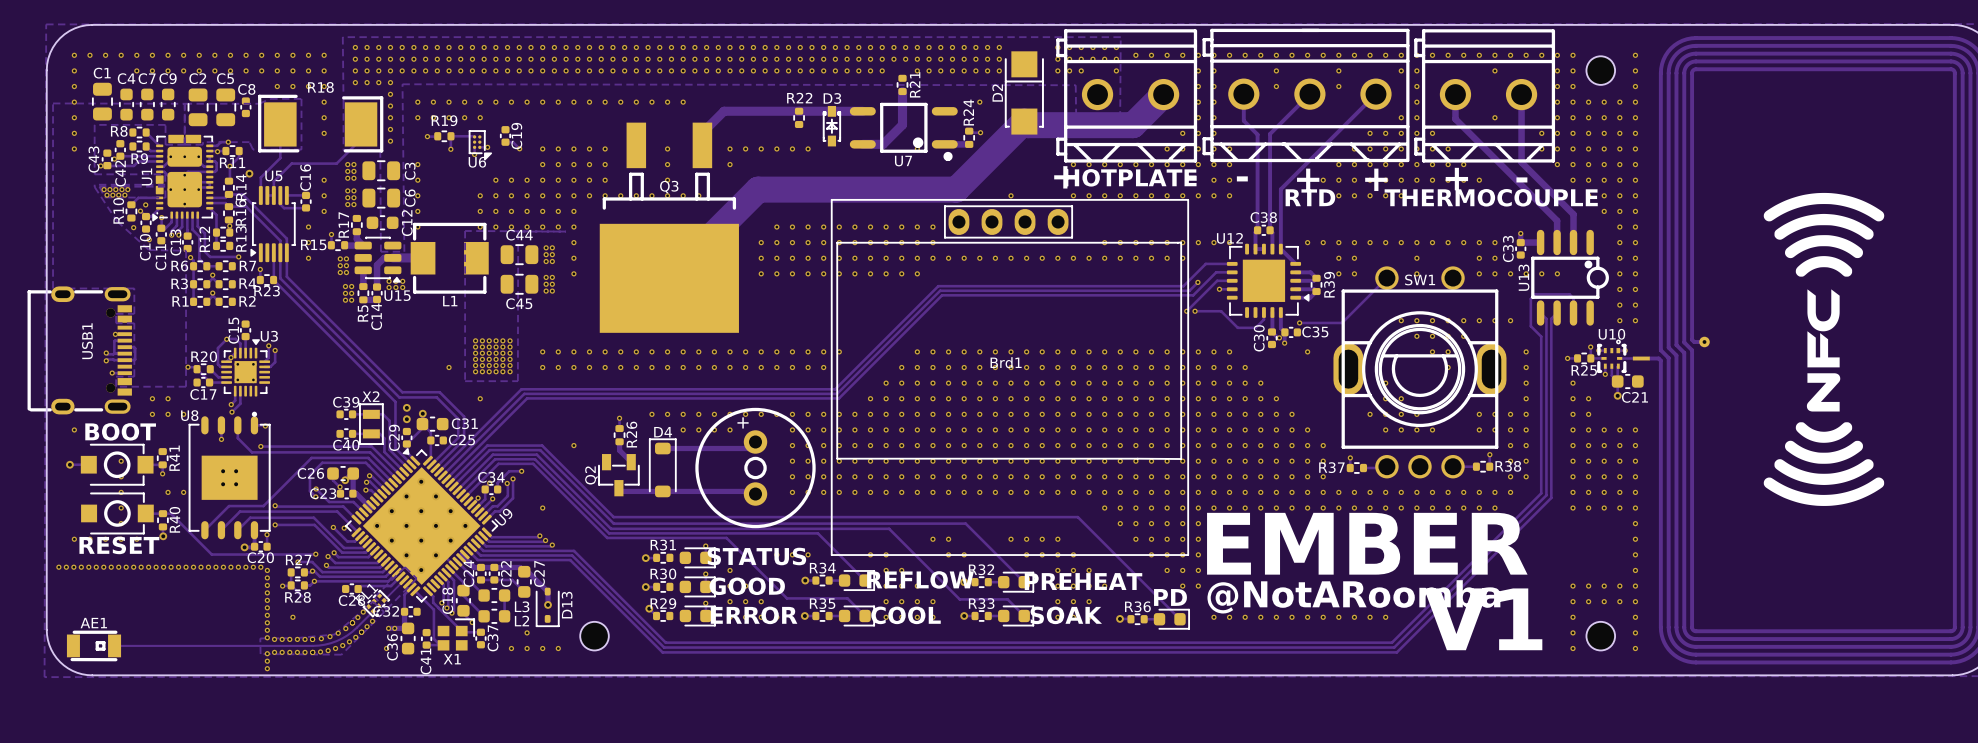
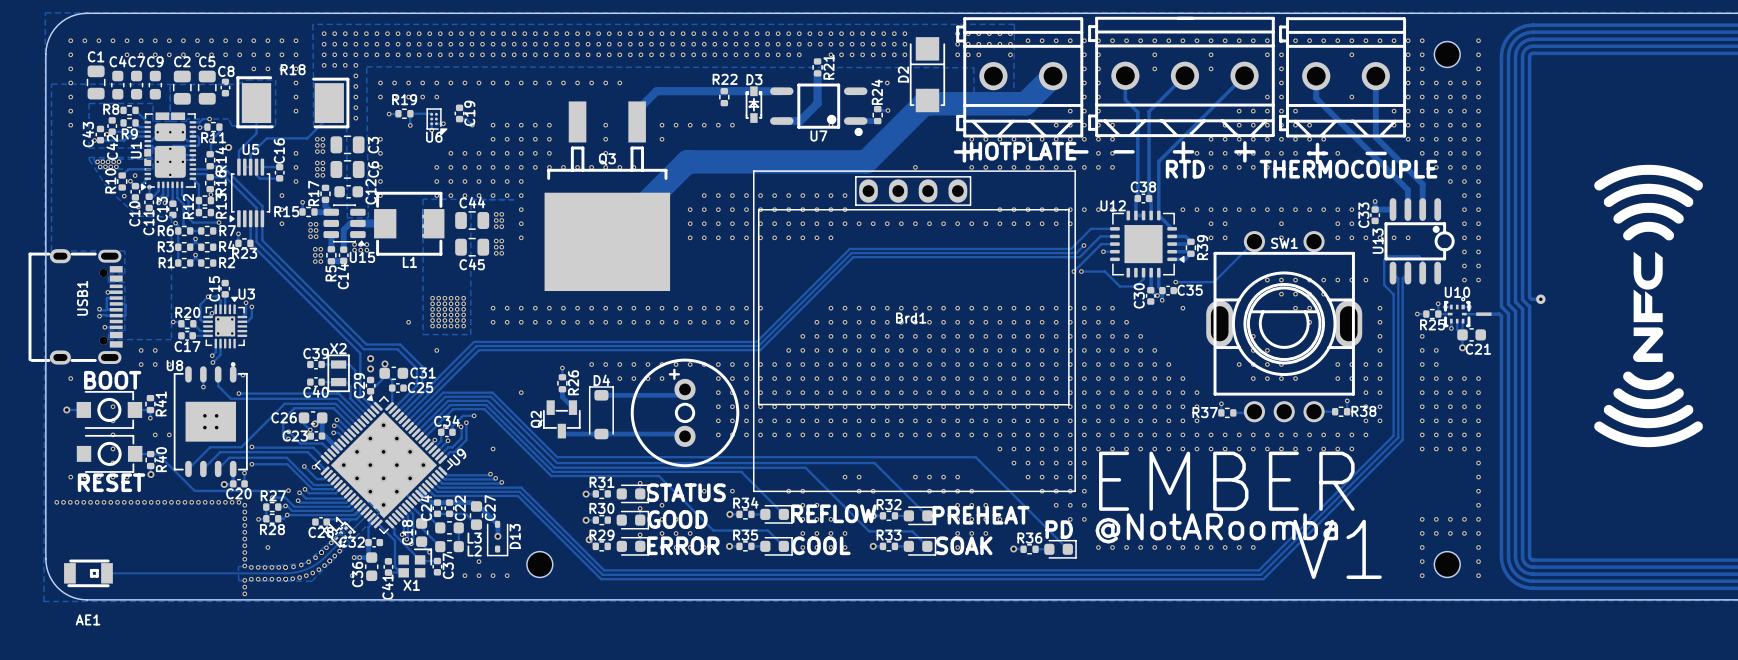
AE1 name position: AE1 (93, 623) -> AE1 (88, 619)

